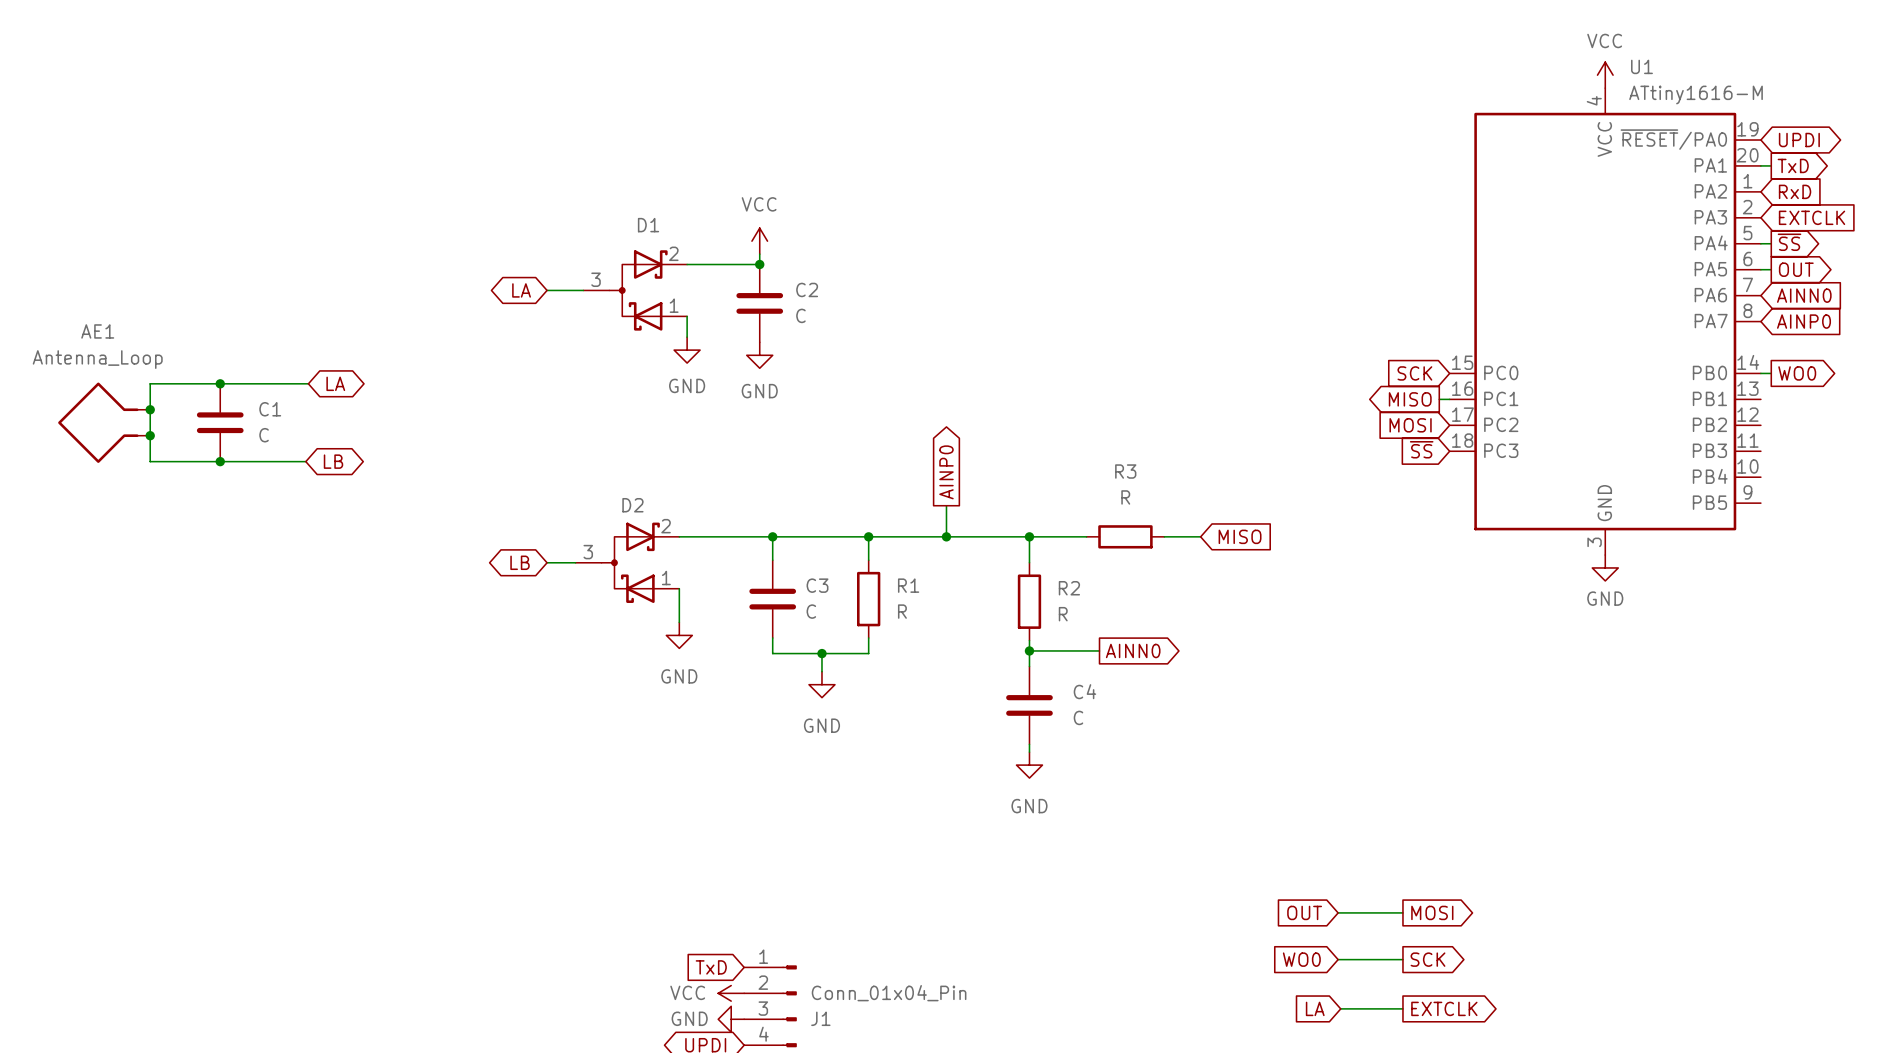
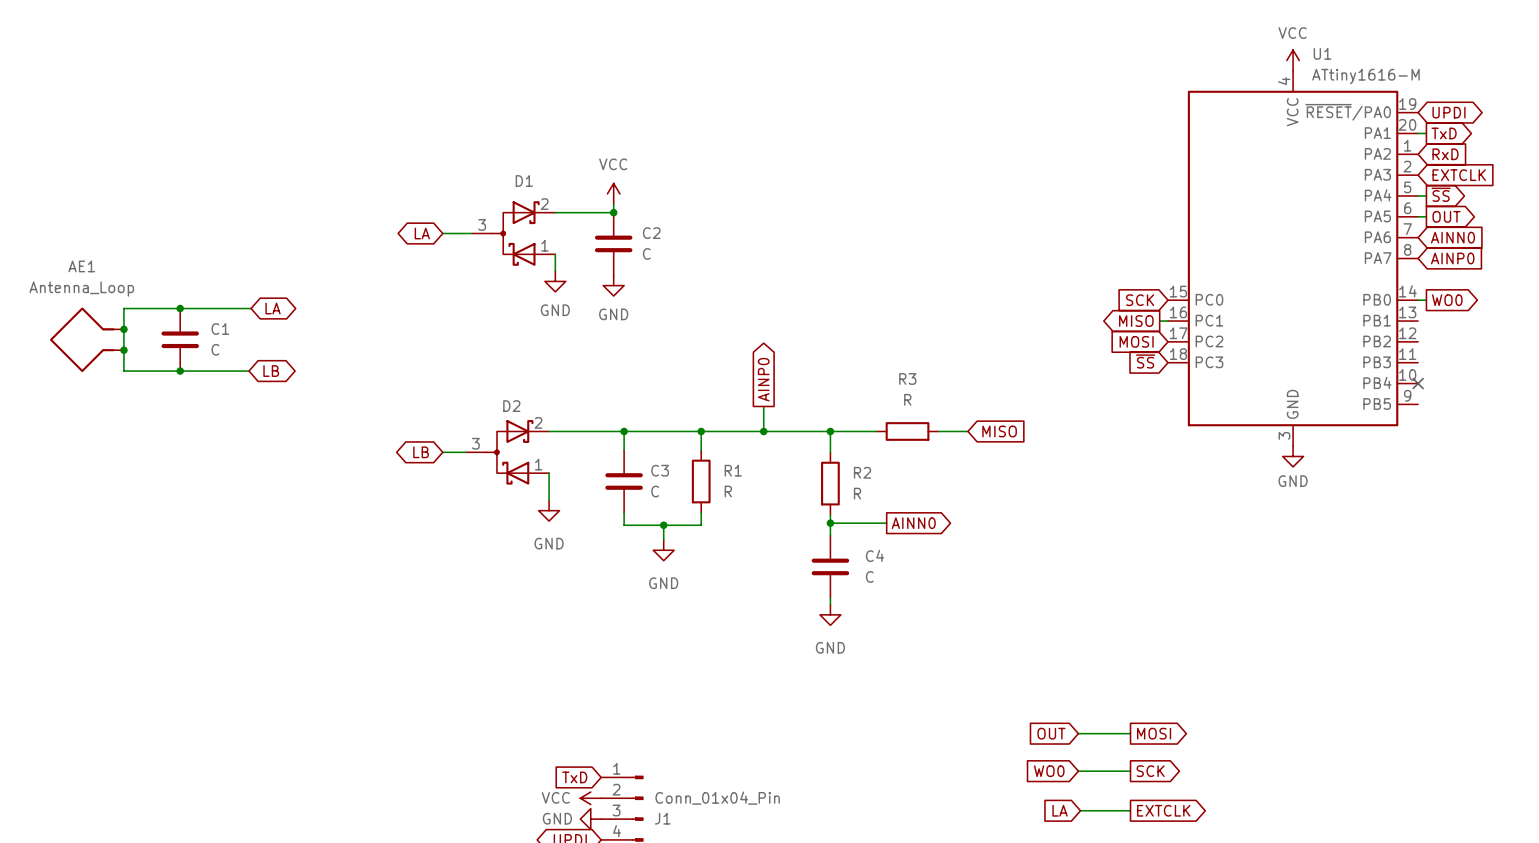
no-connect mark: none -> (1418, 383)

